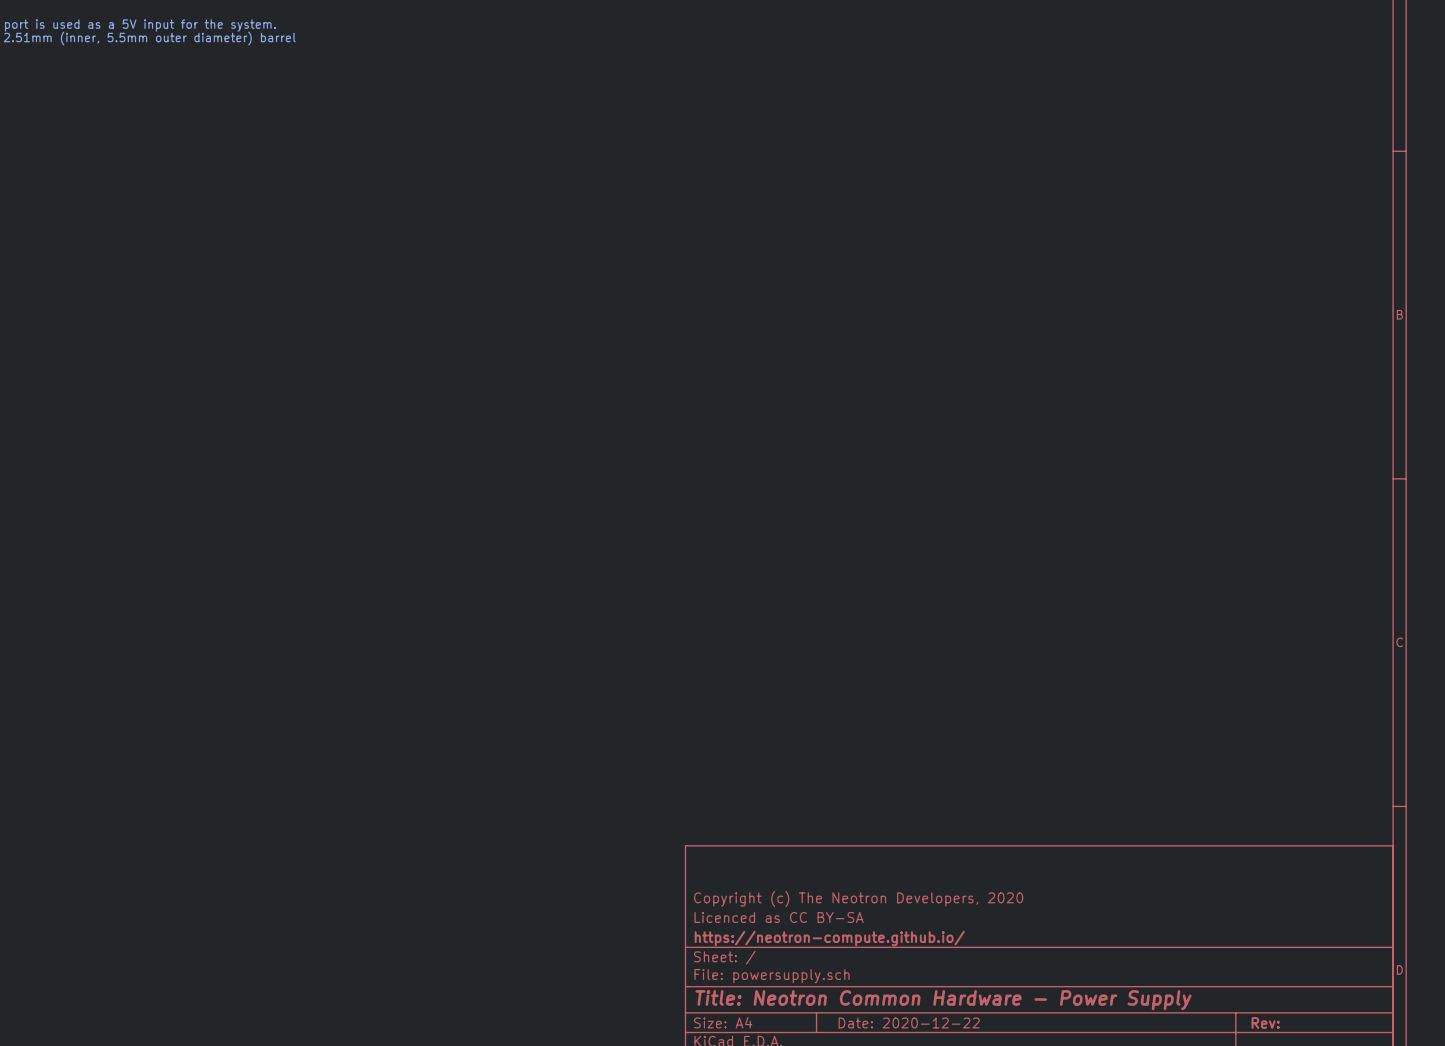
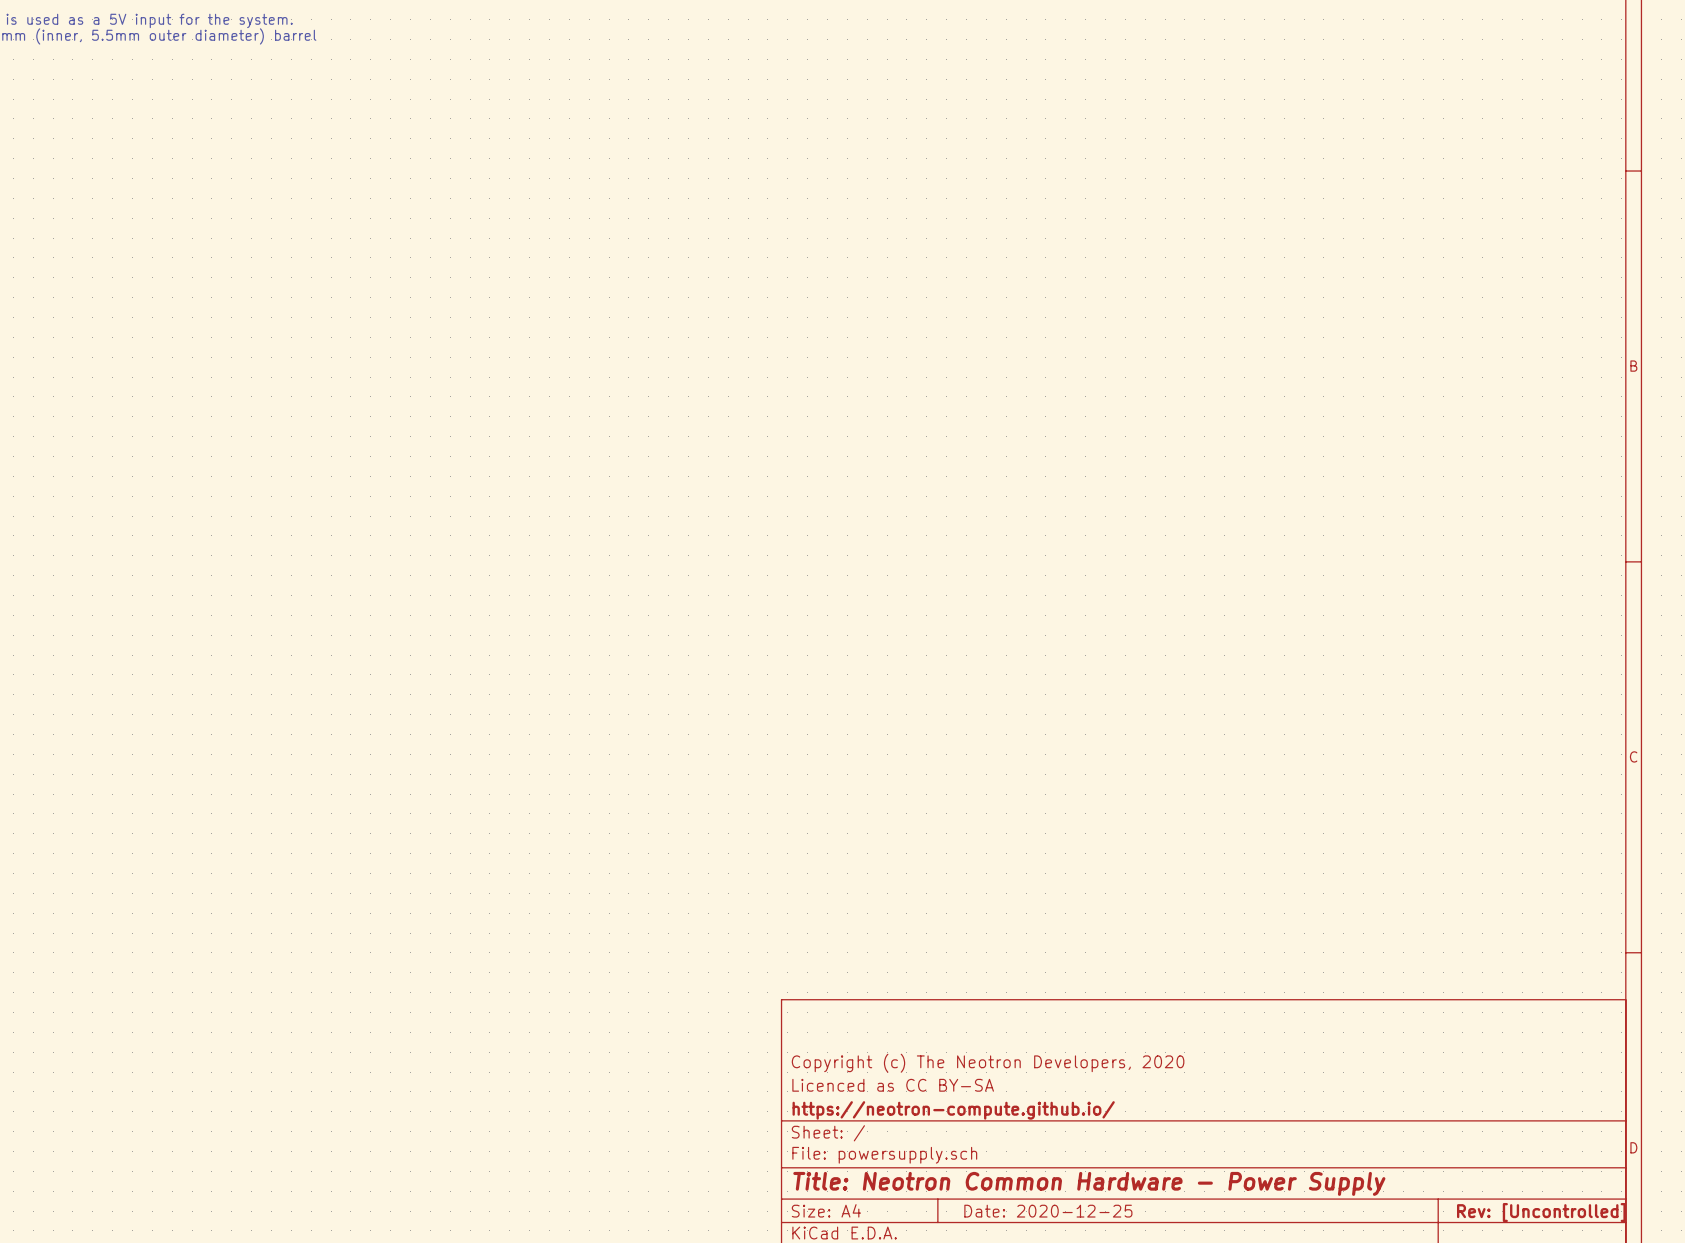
title block: Date: 2020-12-22 (909, 1022) -> Date: 2020-12-25 (1048, 1211)
title block: Rev: (1265, 1022) -> Rev: [Uncontrolled] (1541, 1212)

